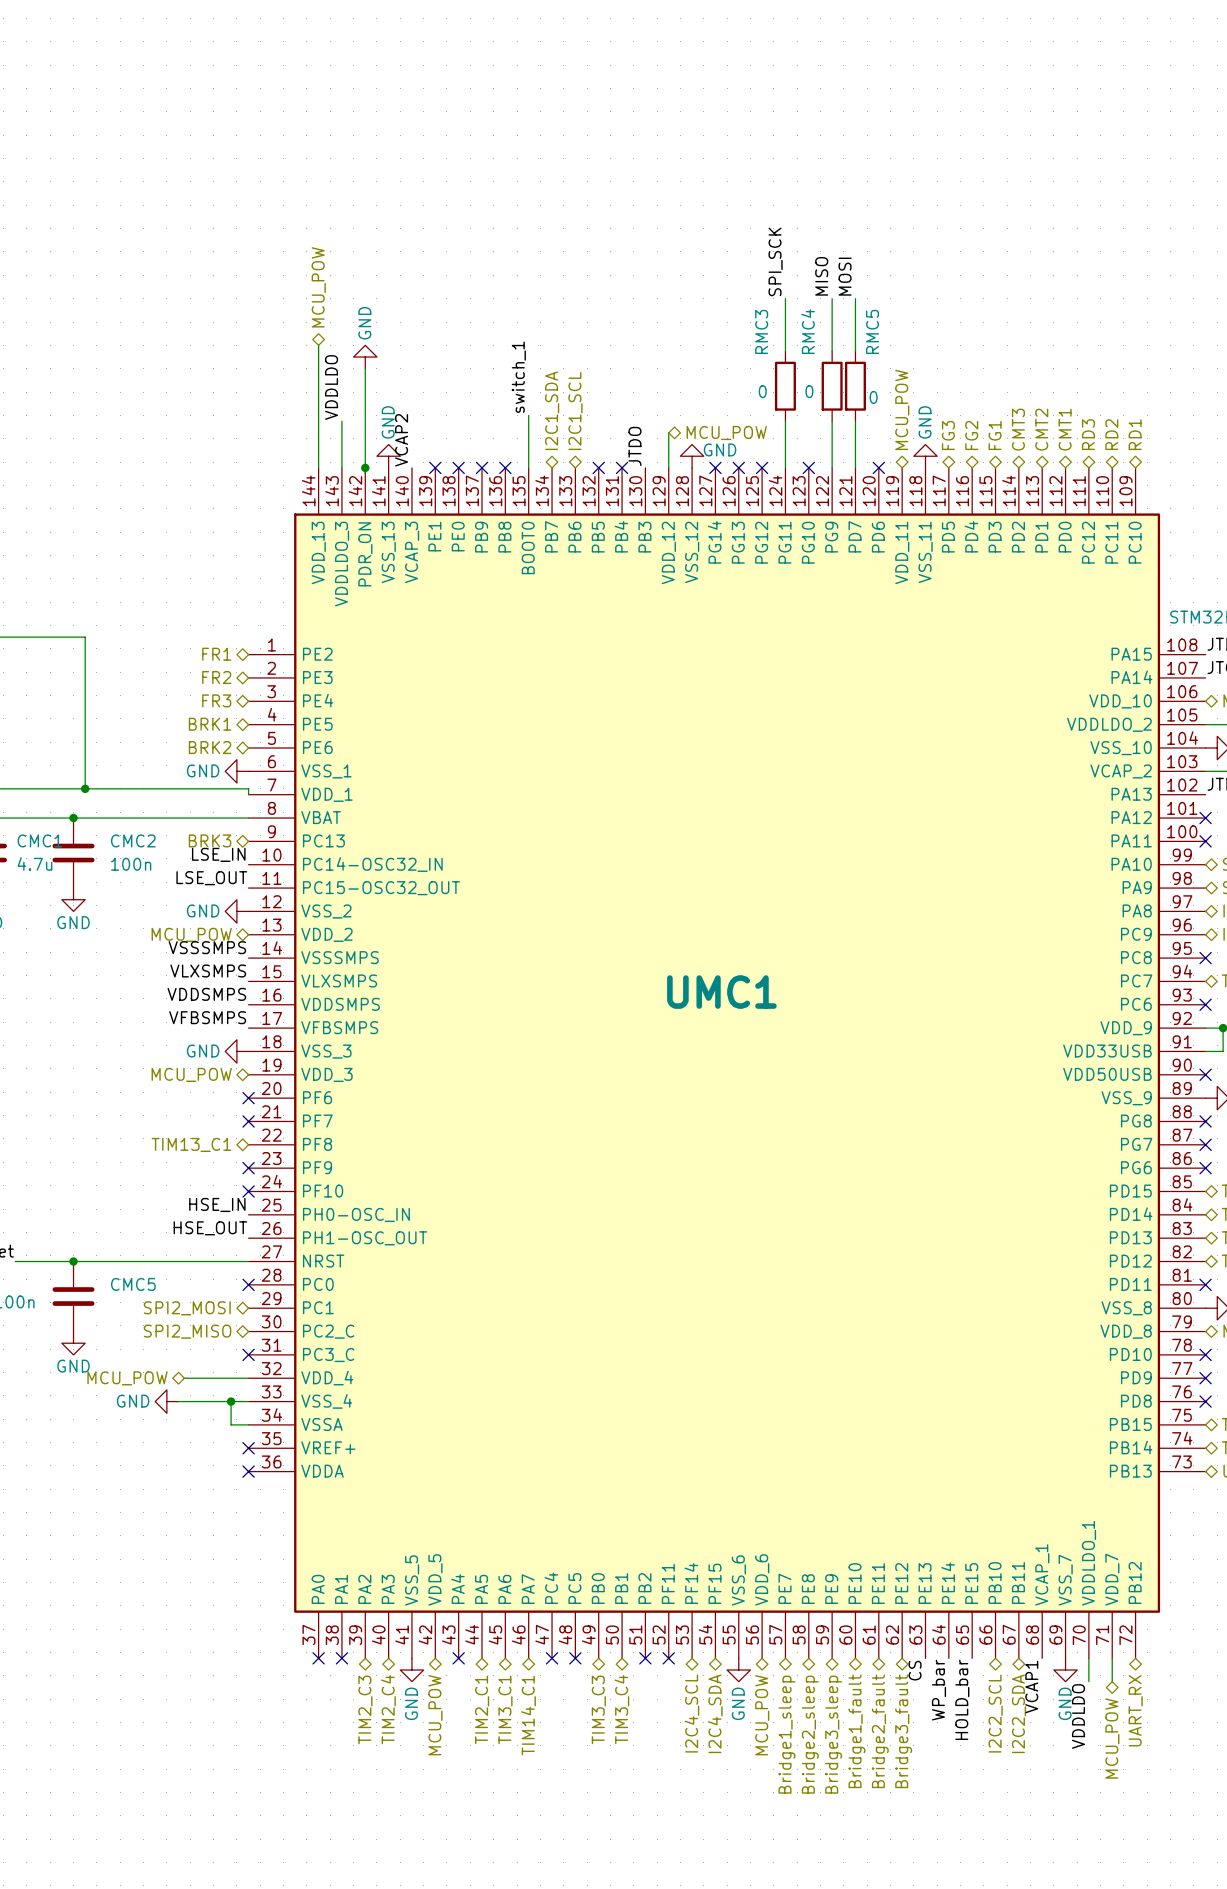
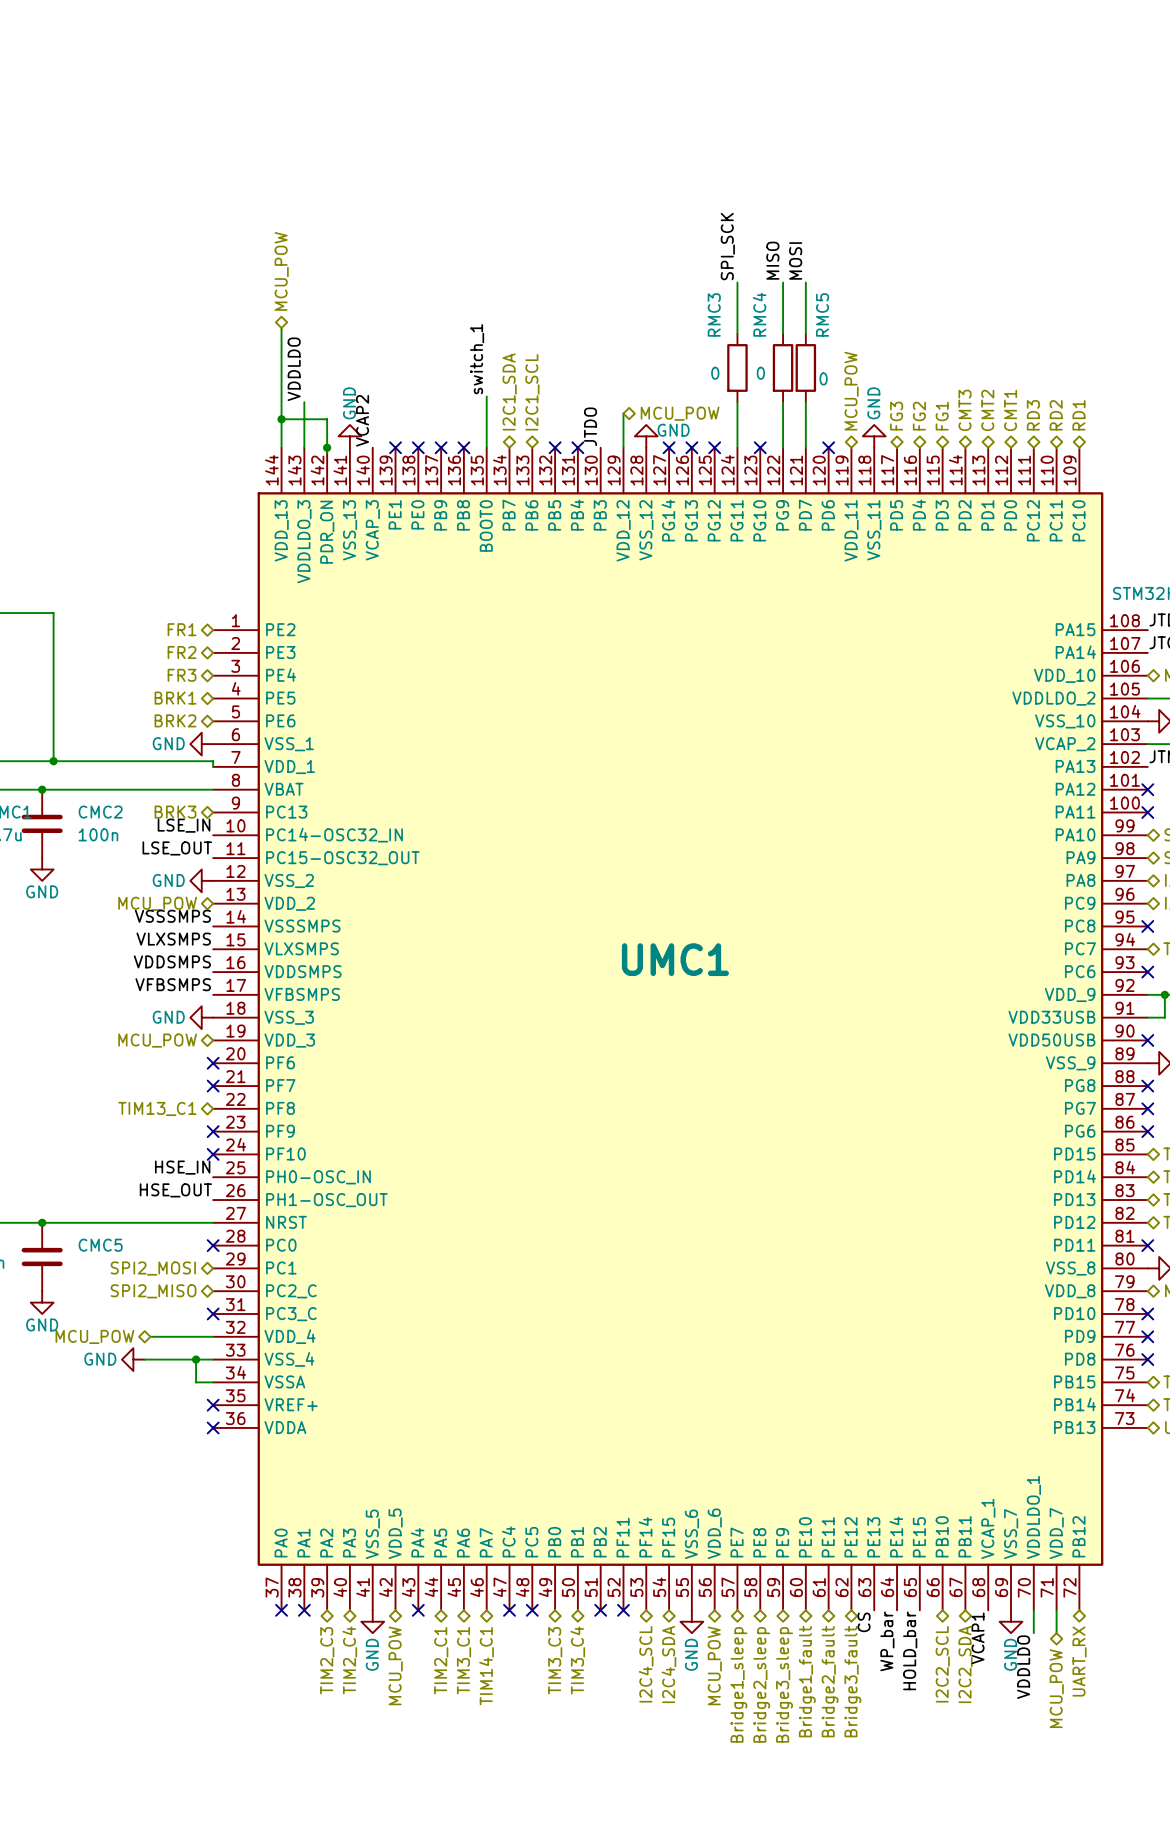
power symbol: GND (365, 357) -> none
wire: (365, 368) (365, 438) -> (281, 419) (327, 419)
junction: none -> (281, 419)

